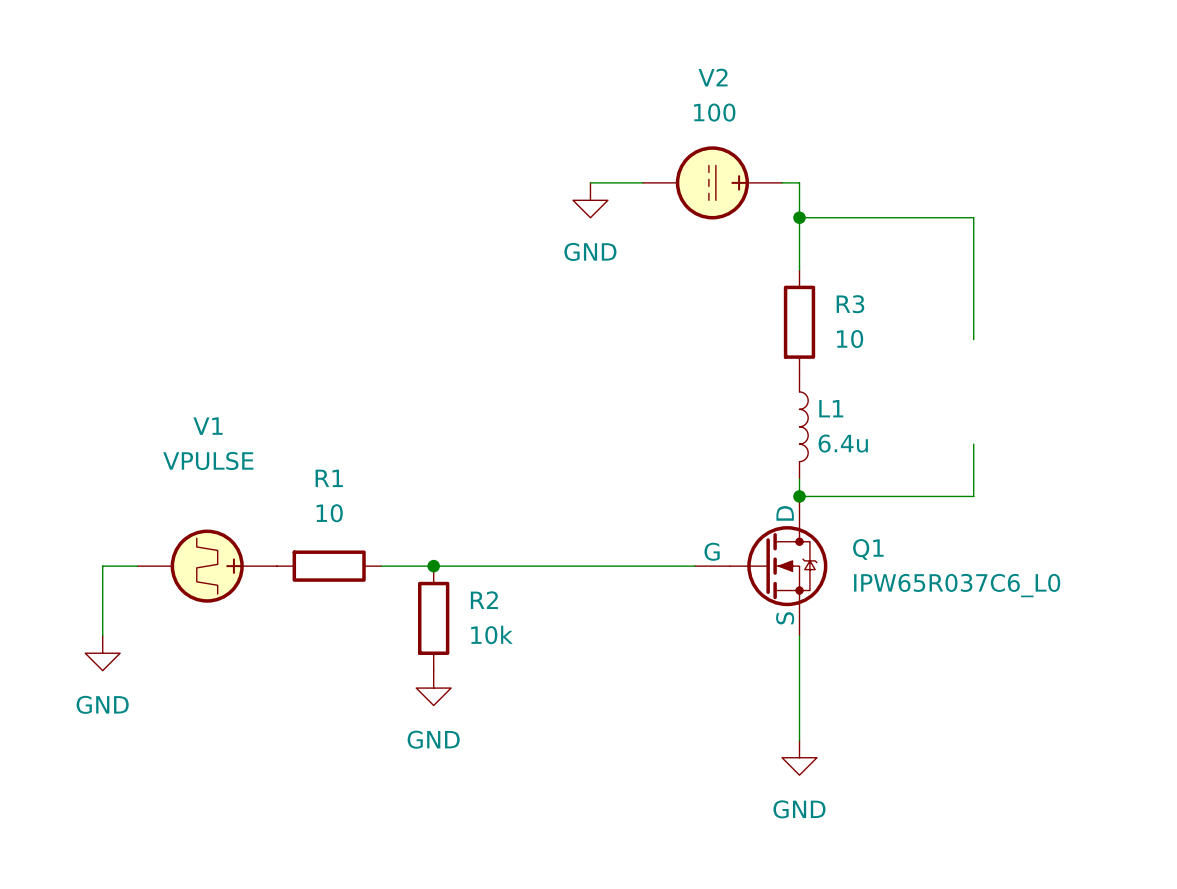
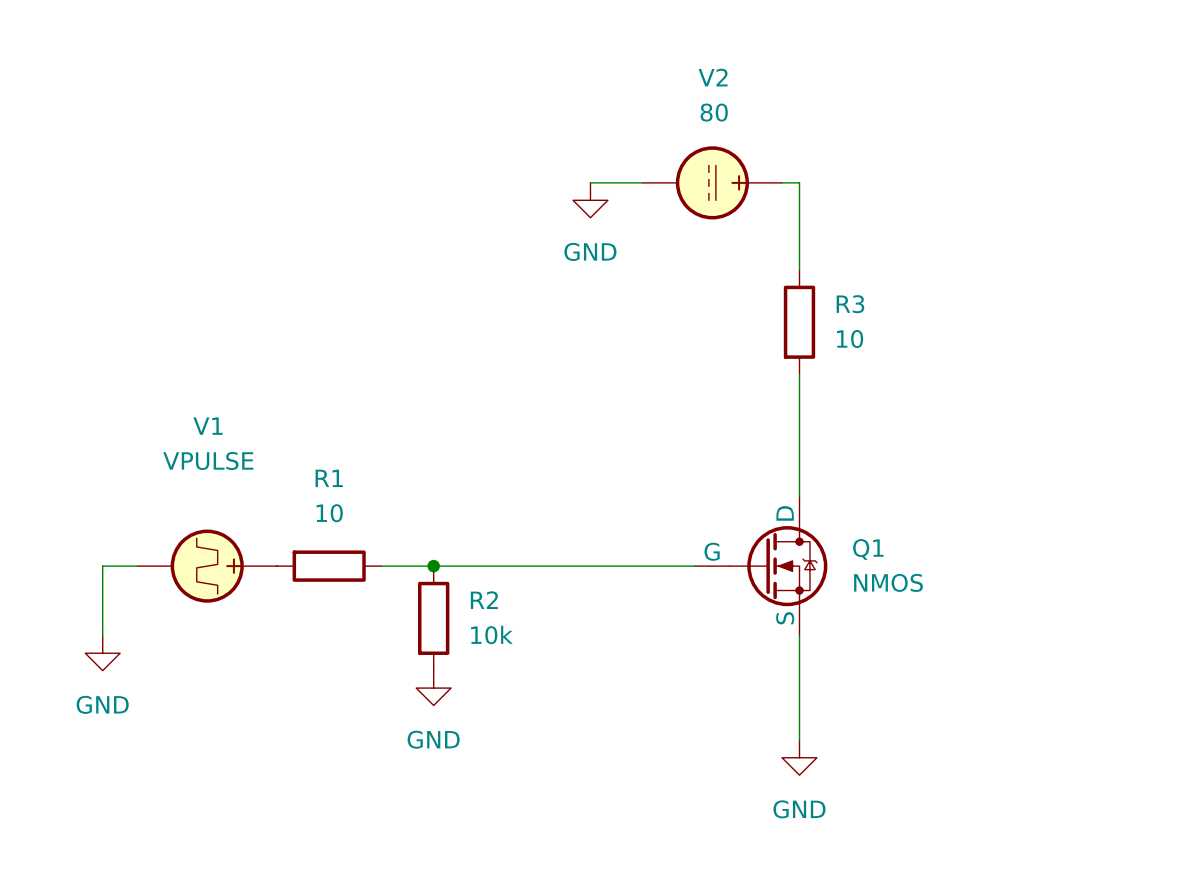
V2 value: 100 (714, 112) -> 80 (714, 112)
wire: (799, 217) (973, 217) (973, 339) -> none
junction: (799, 217) -> none
wire: none -> (799, 374) (799, 479)
L1: 6.4u (803, 426) -> none
wire: (973, 444) (973, 496) (799, 496) -> none
junction: (799, 496) -> none
Q1 value: IPW65R037C6_L0 (957, 585) -> NMOS (888, 582)

